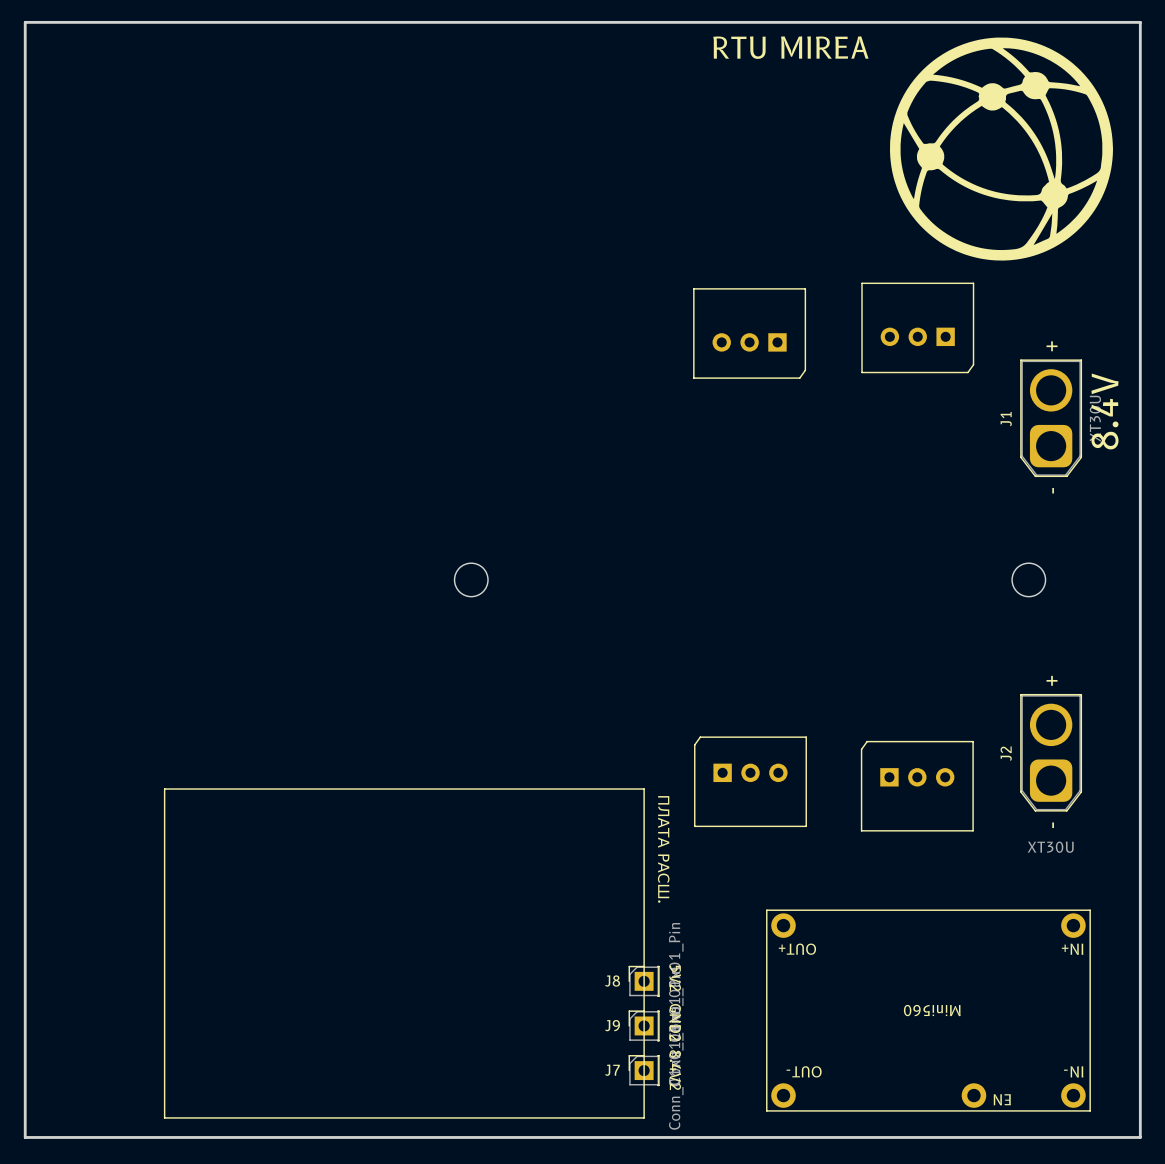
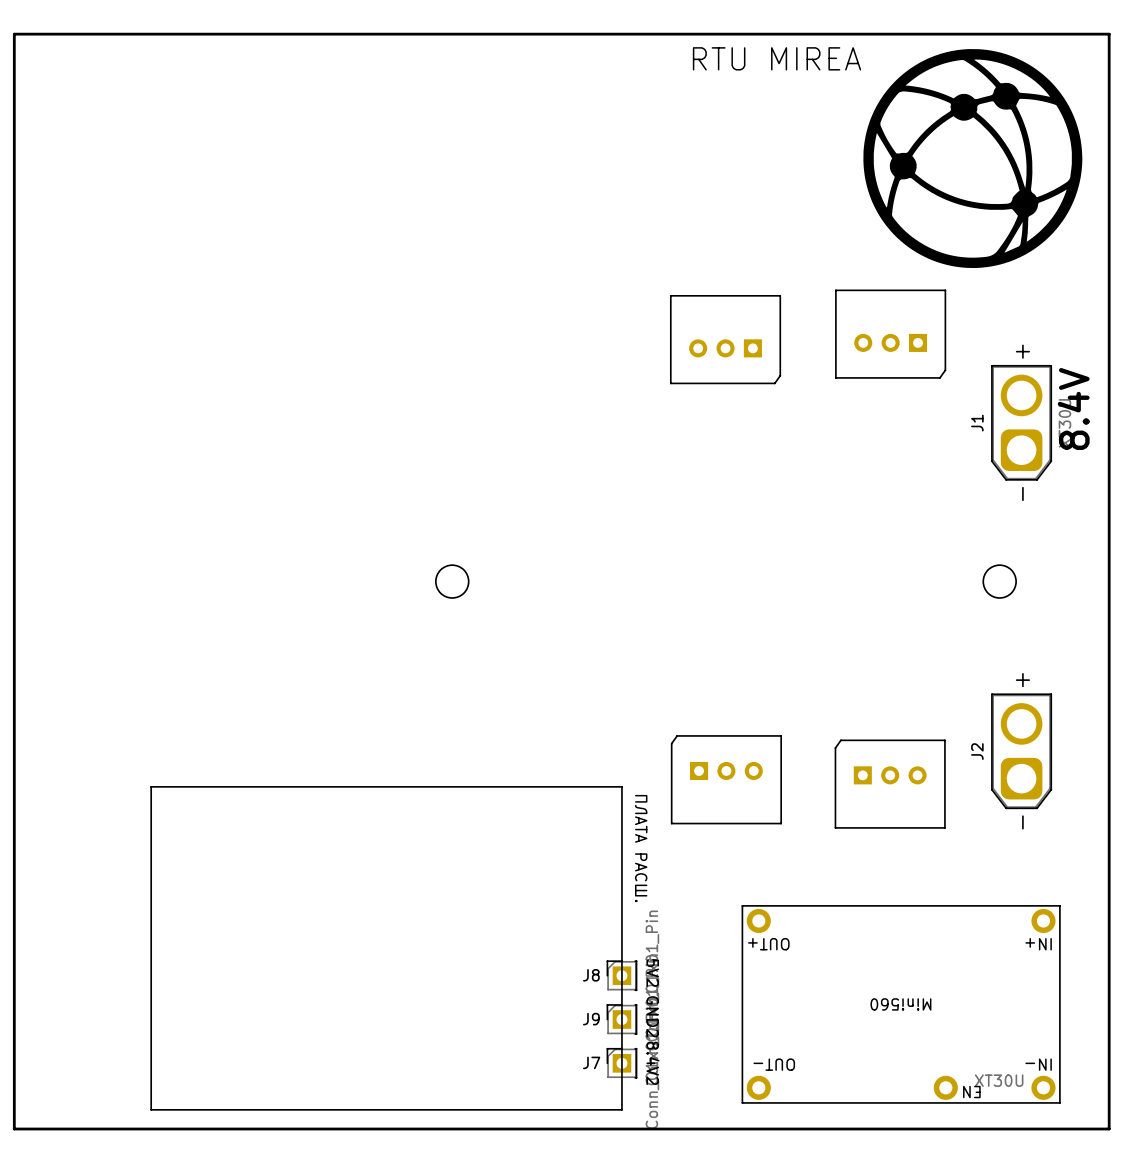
J2 value position: XT30U (1050, 847) -> XT30U (999, 1080)

